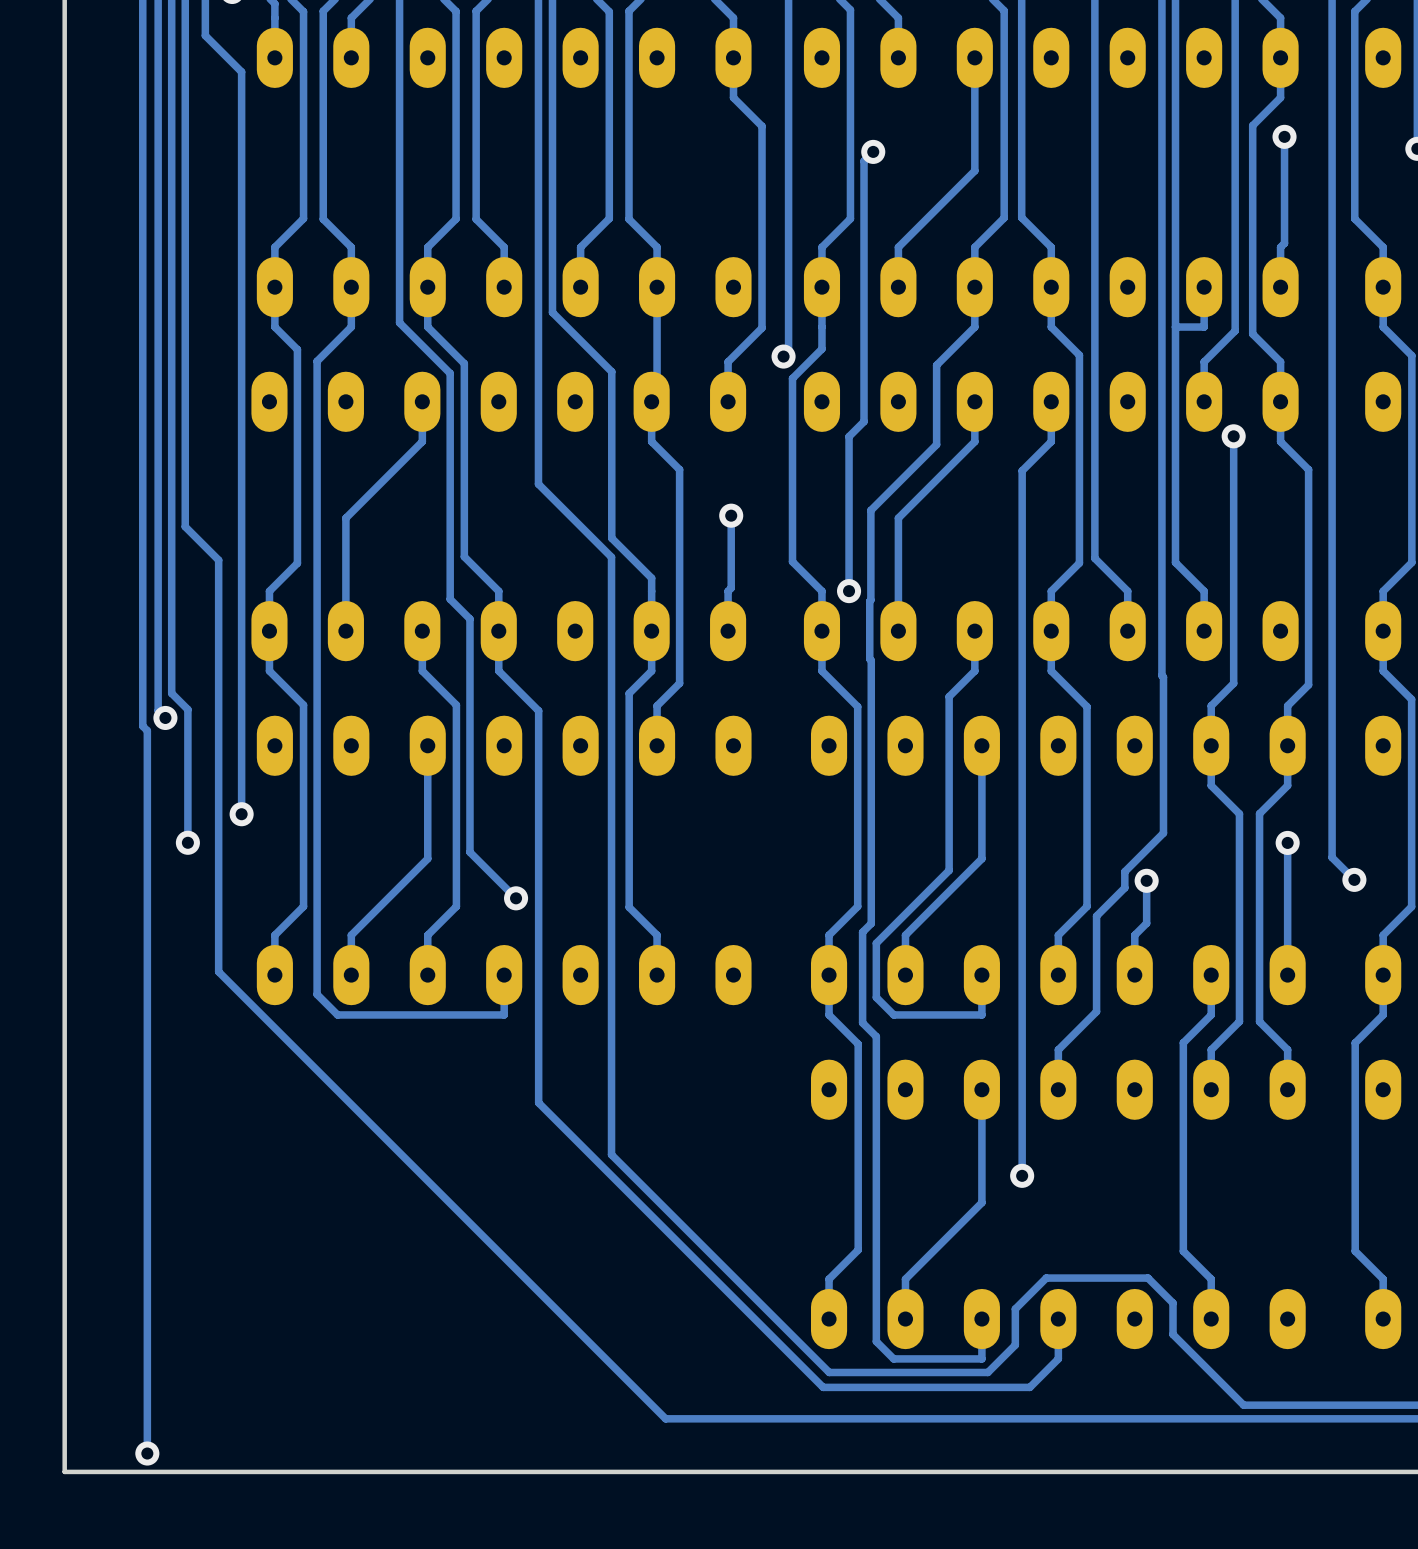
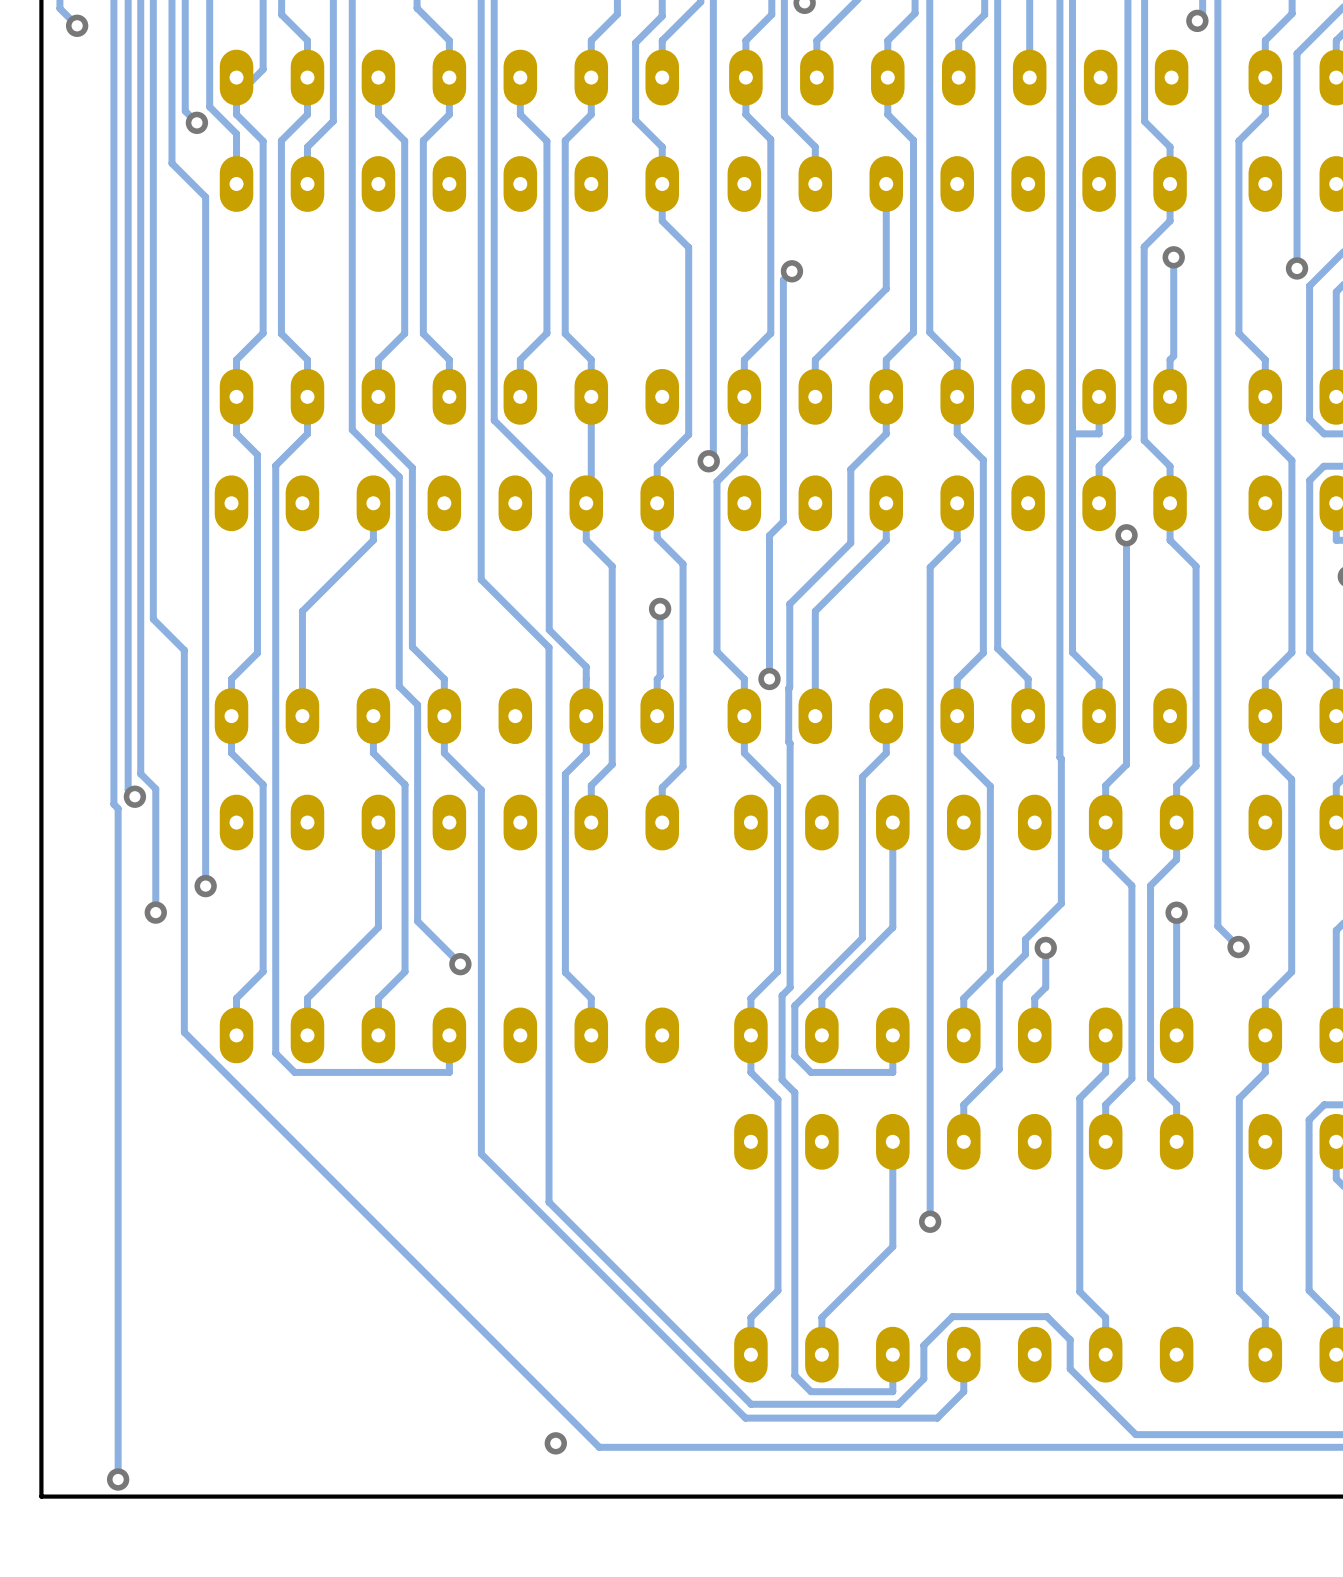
track: none -> (657, 503) (657, 538) (683, 564) (683, 766) (662, 787) (662, 822)
via: none -> (555, 1443)

